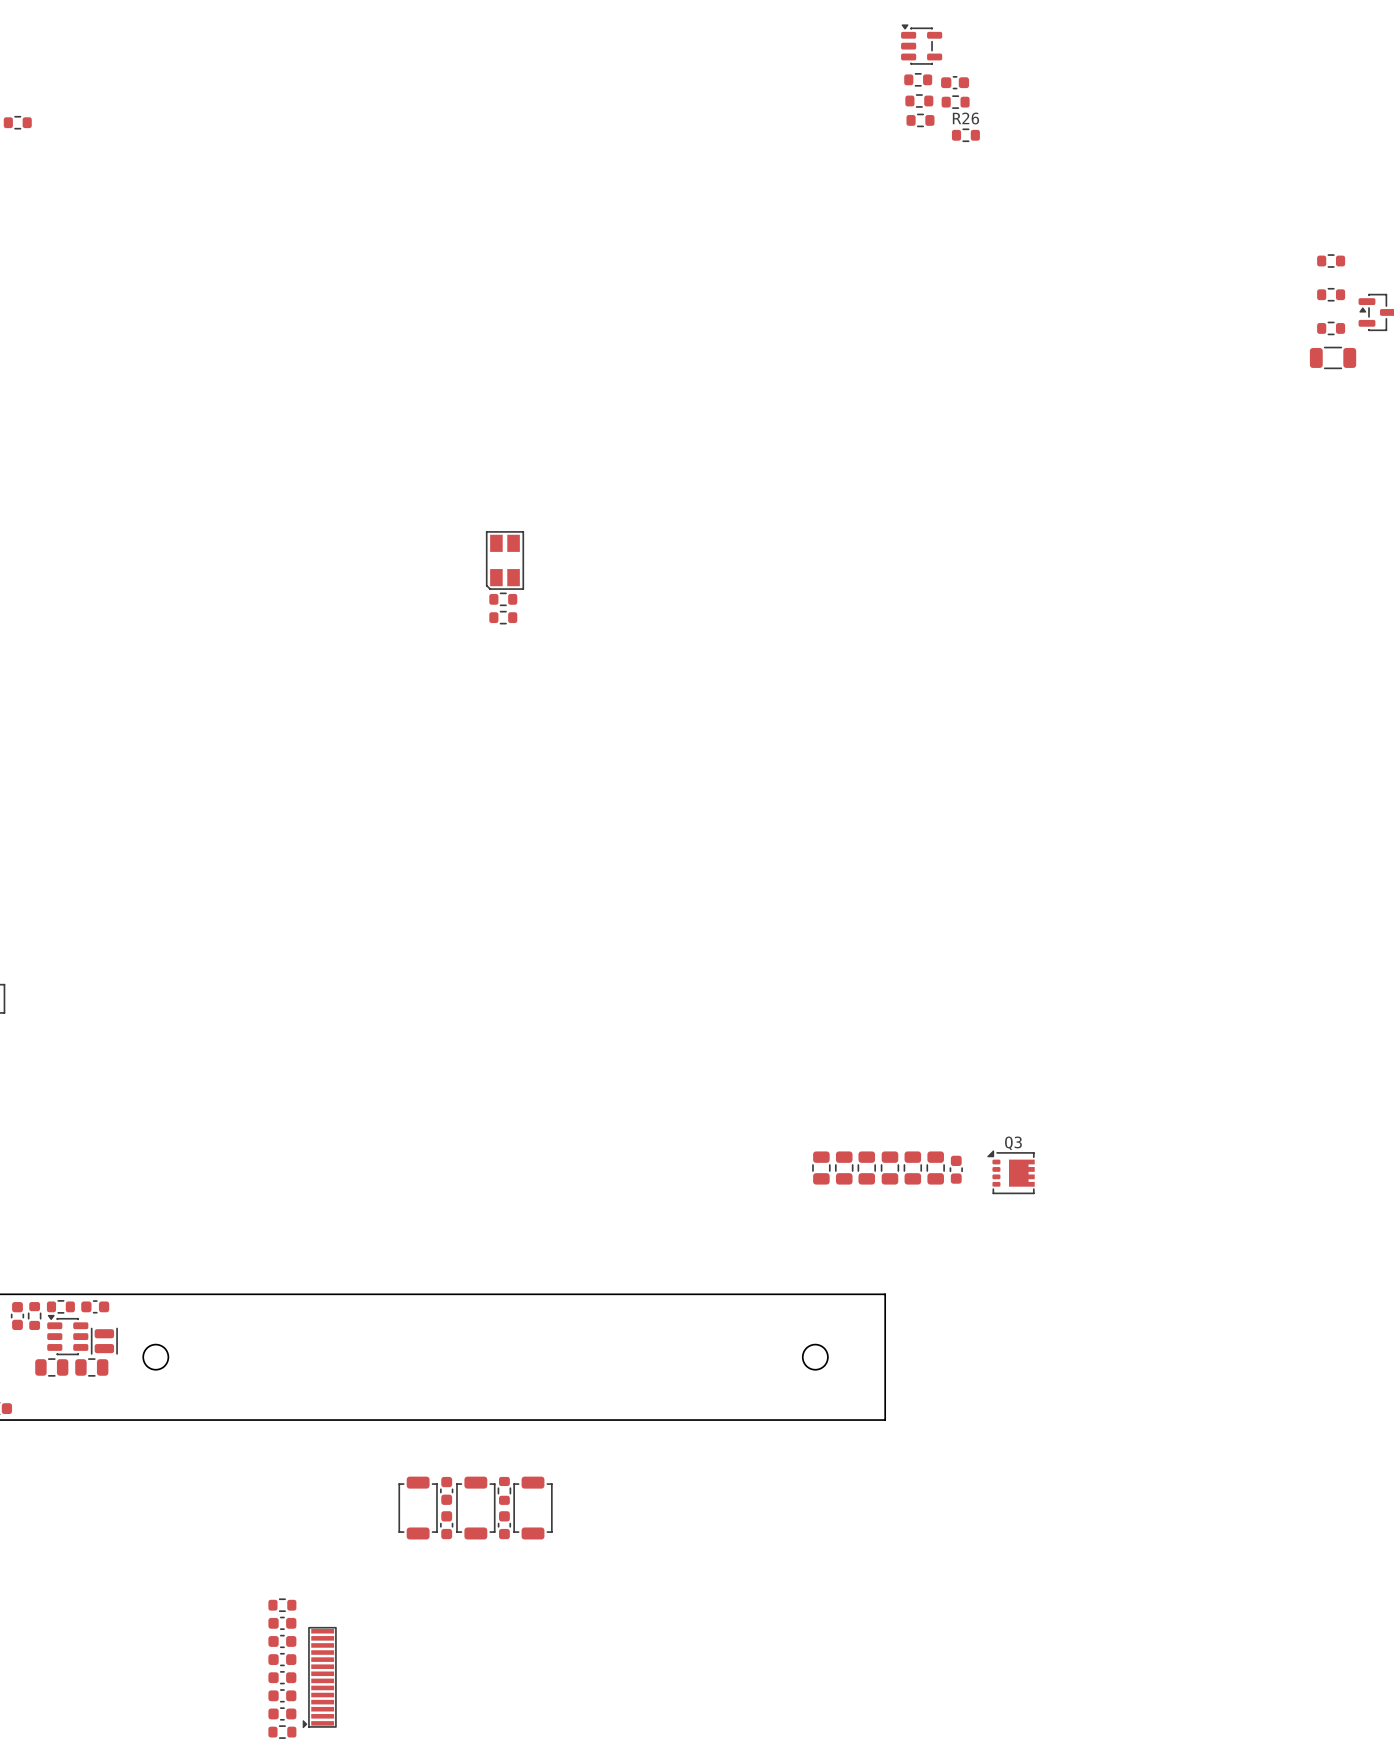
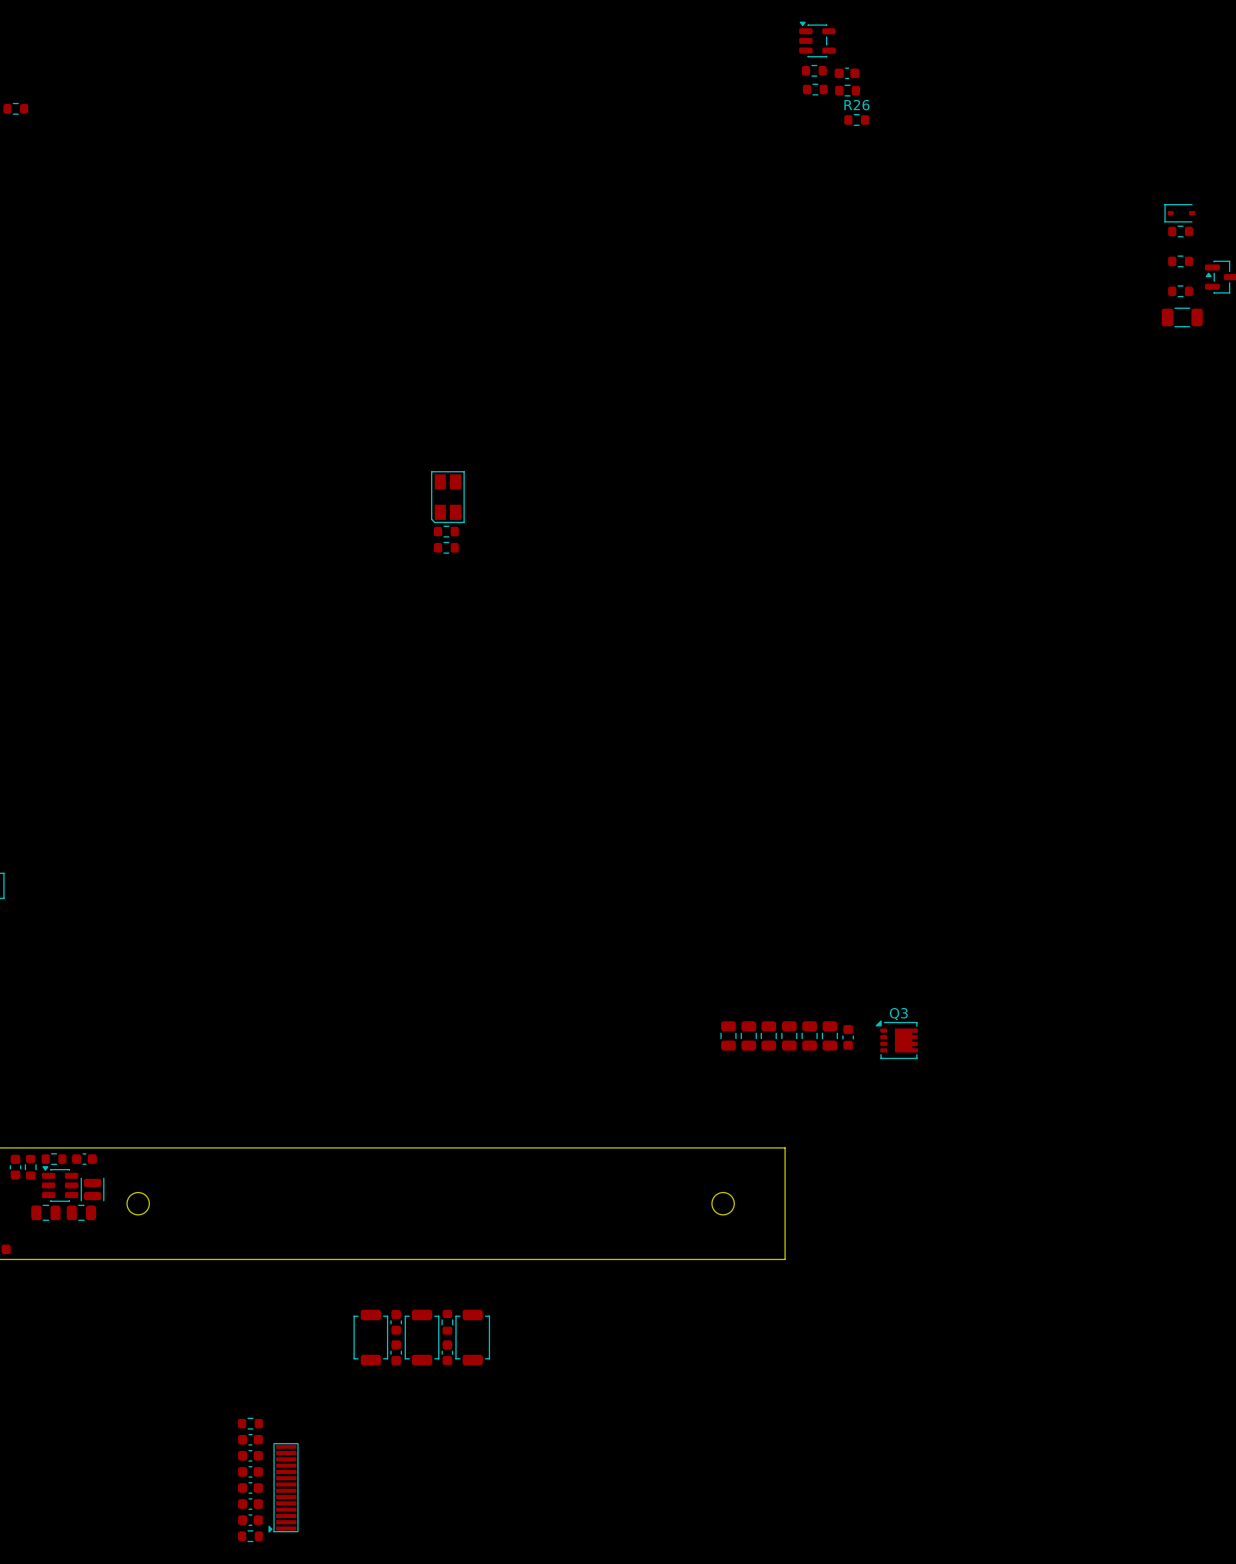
part: (920, 120) -> none
part: none -> (1179, 213)

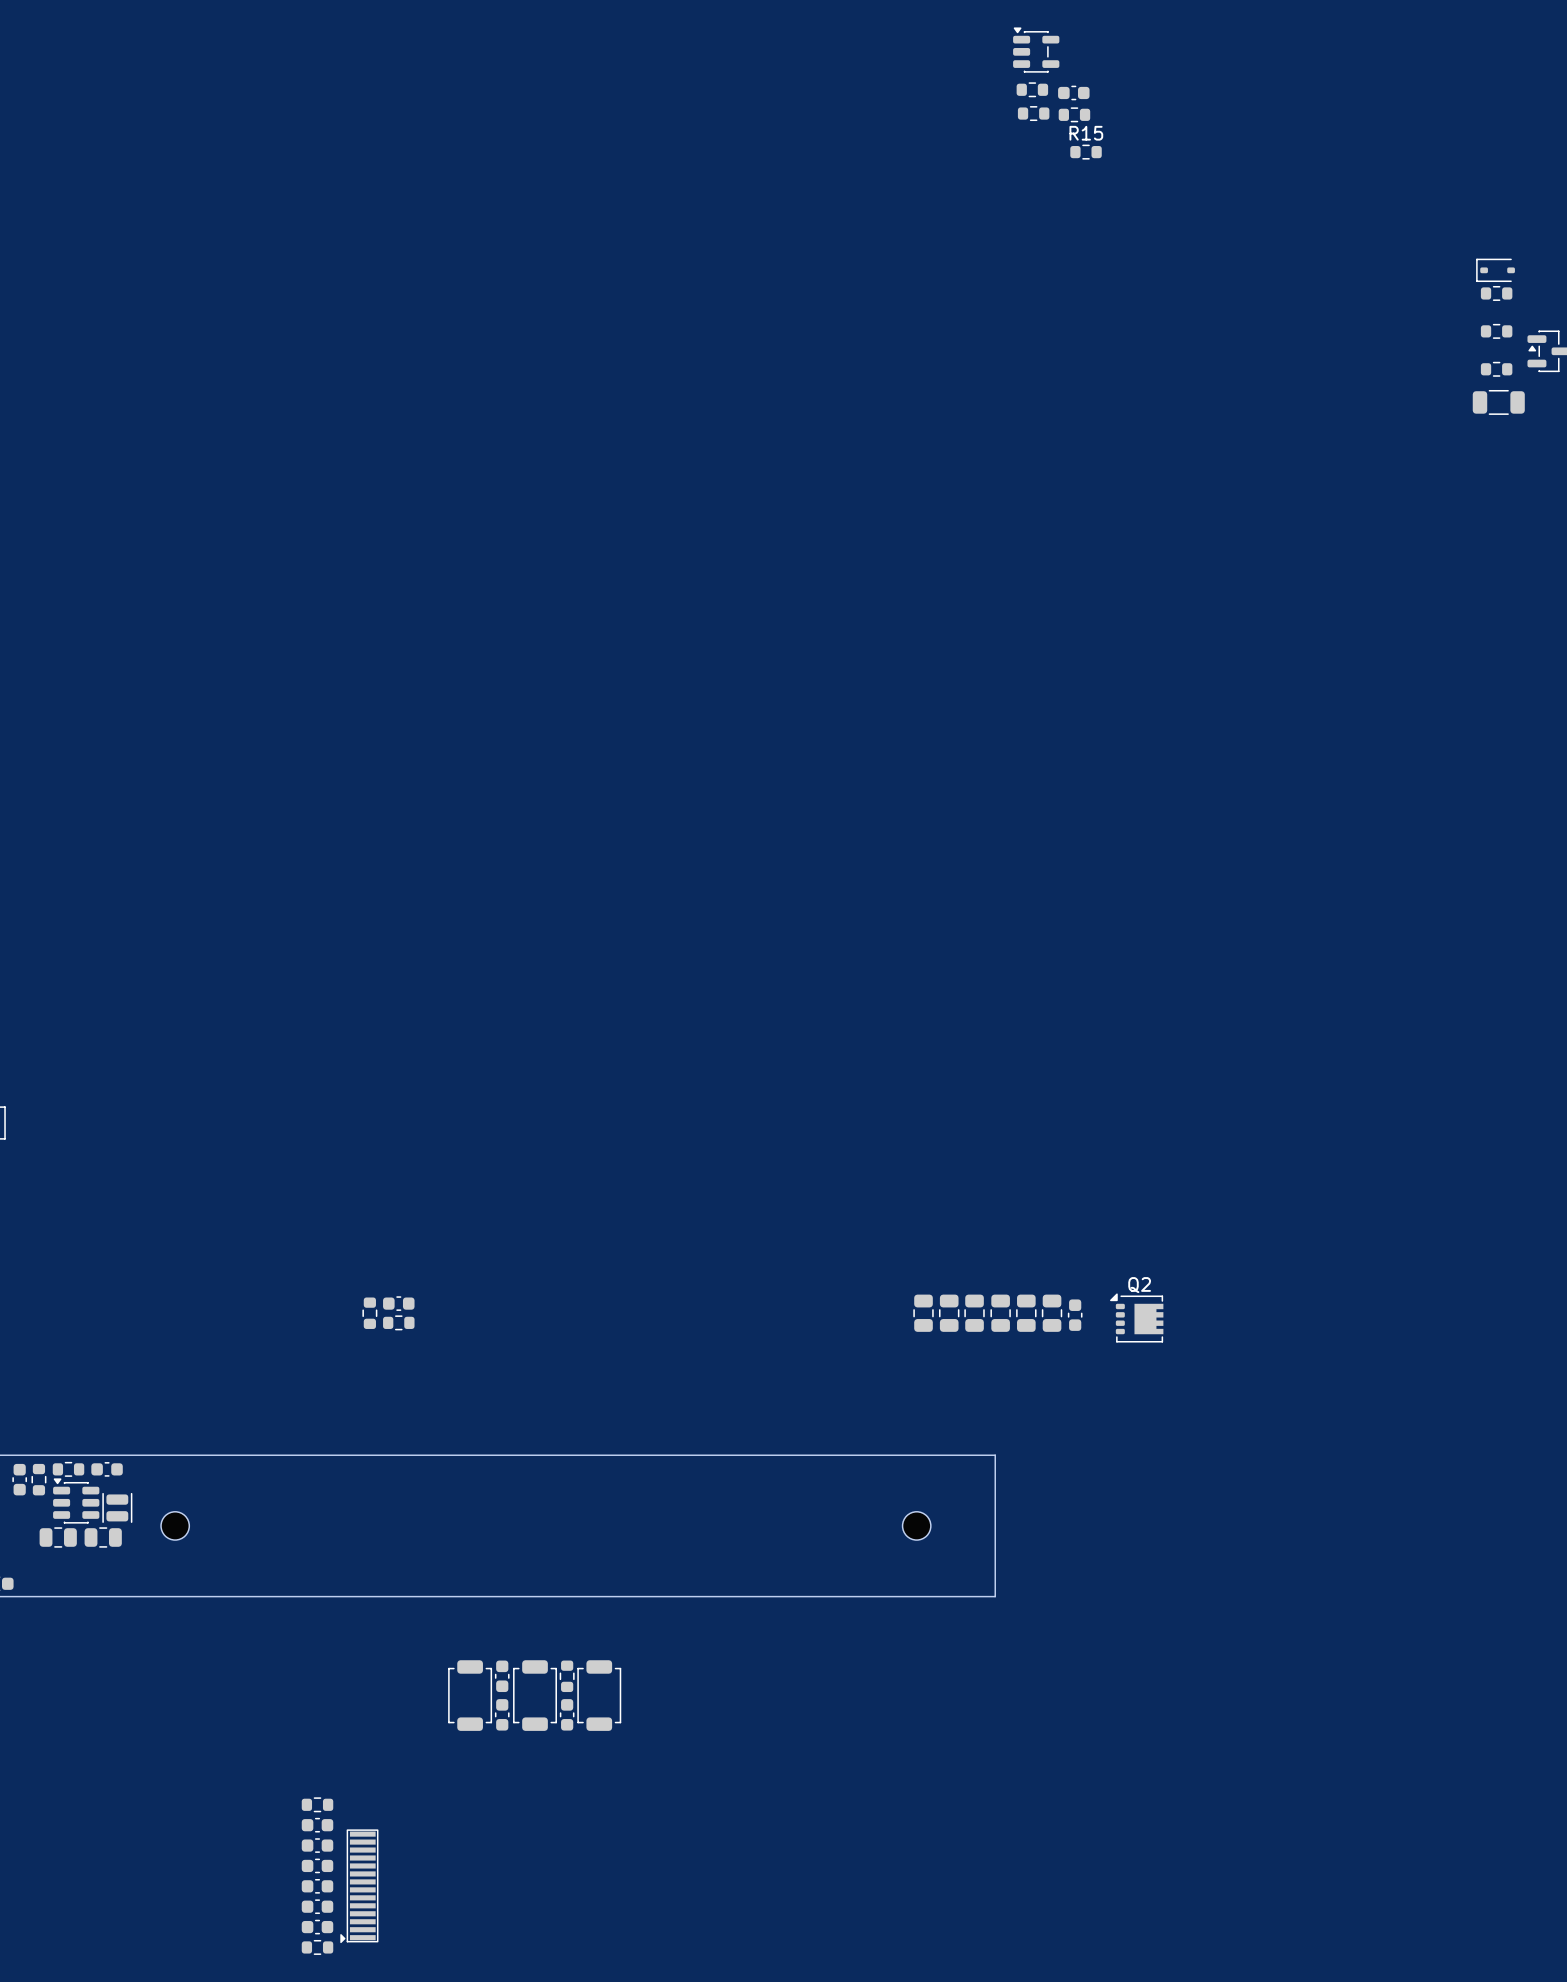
R26 name: R26 (856, 105) -> R15 (1086, 133)
part: (15, 108) -> none
part: (447, 497) -> none
part: (446, 531) -> none
part: (446, 547) -> none
Q3 name: Q3 (898, 1014) -> Q2 (1139, 1285)
part: none -> (398, 1303)
part: none -> (369, 1313)
part: none -> (398, 1322)

